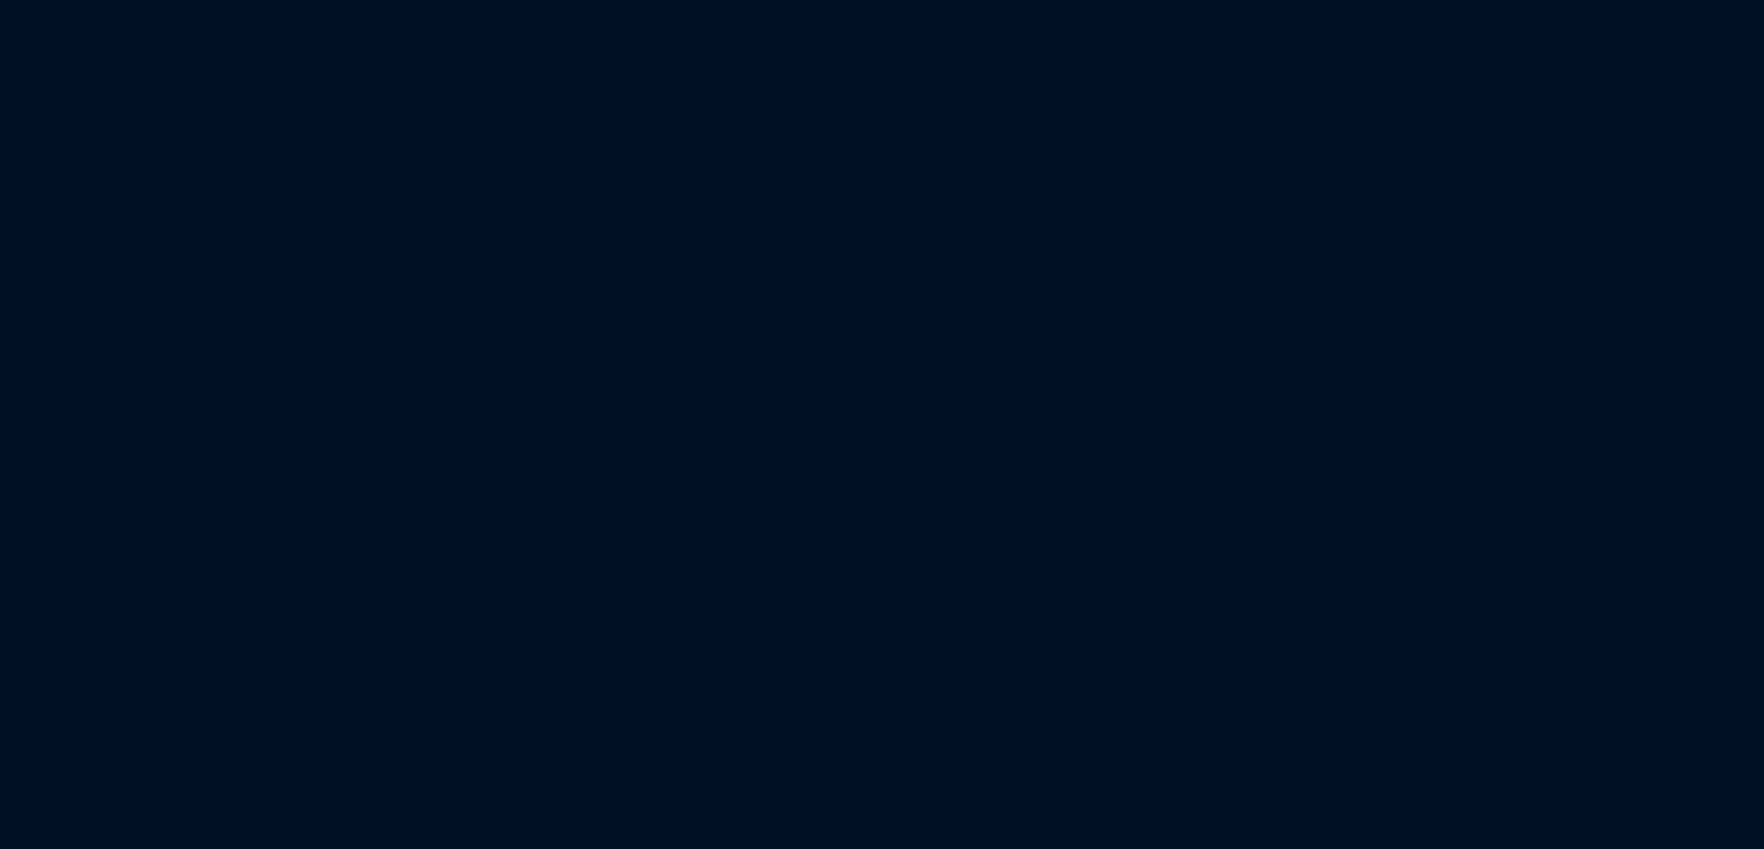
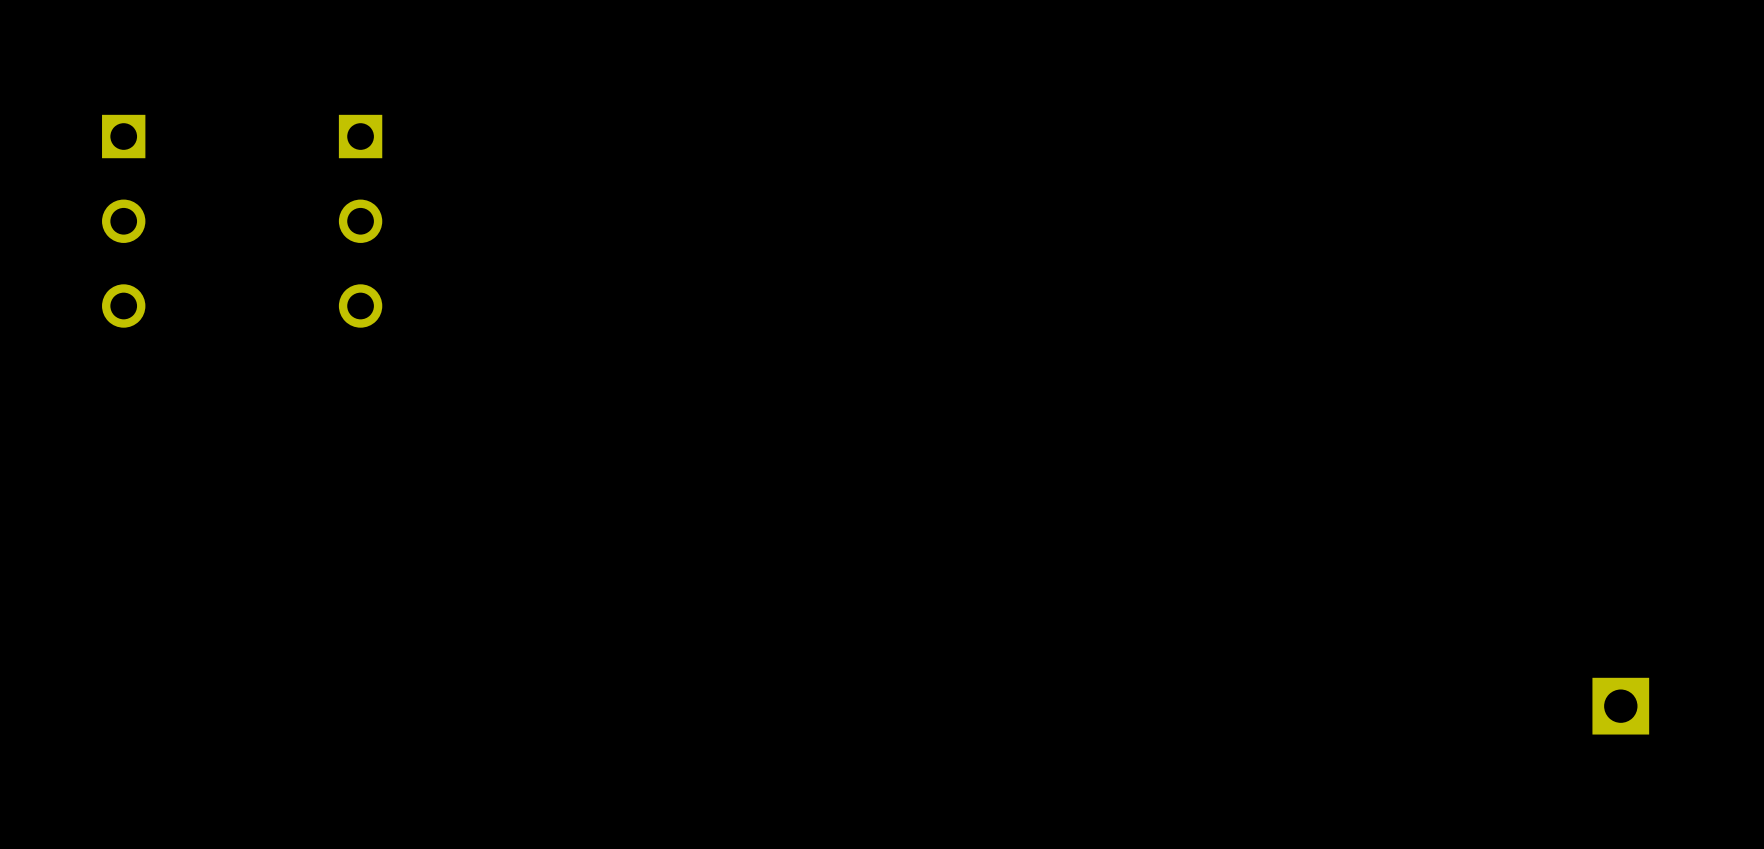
part: none -> (123, 221)
part: none -> (360, 221)
part: none -> (1620, 706)

